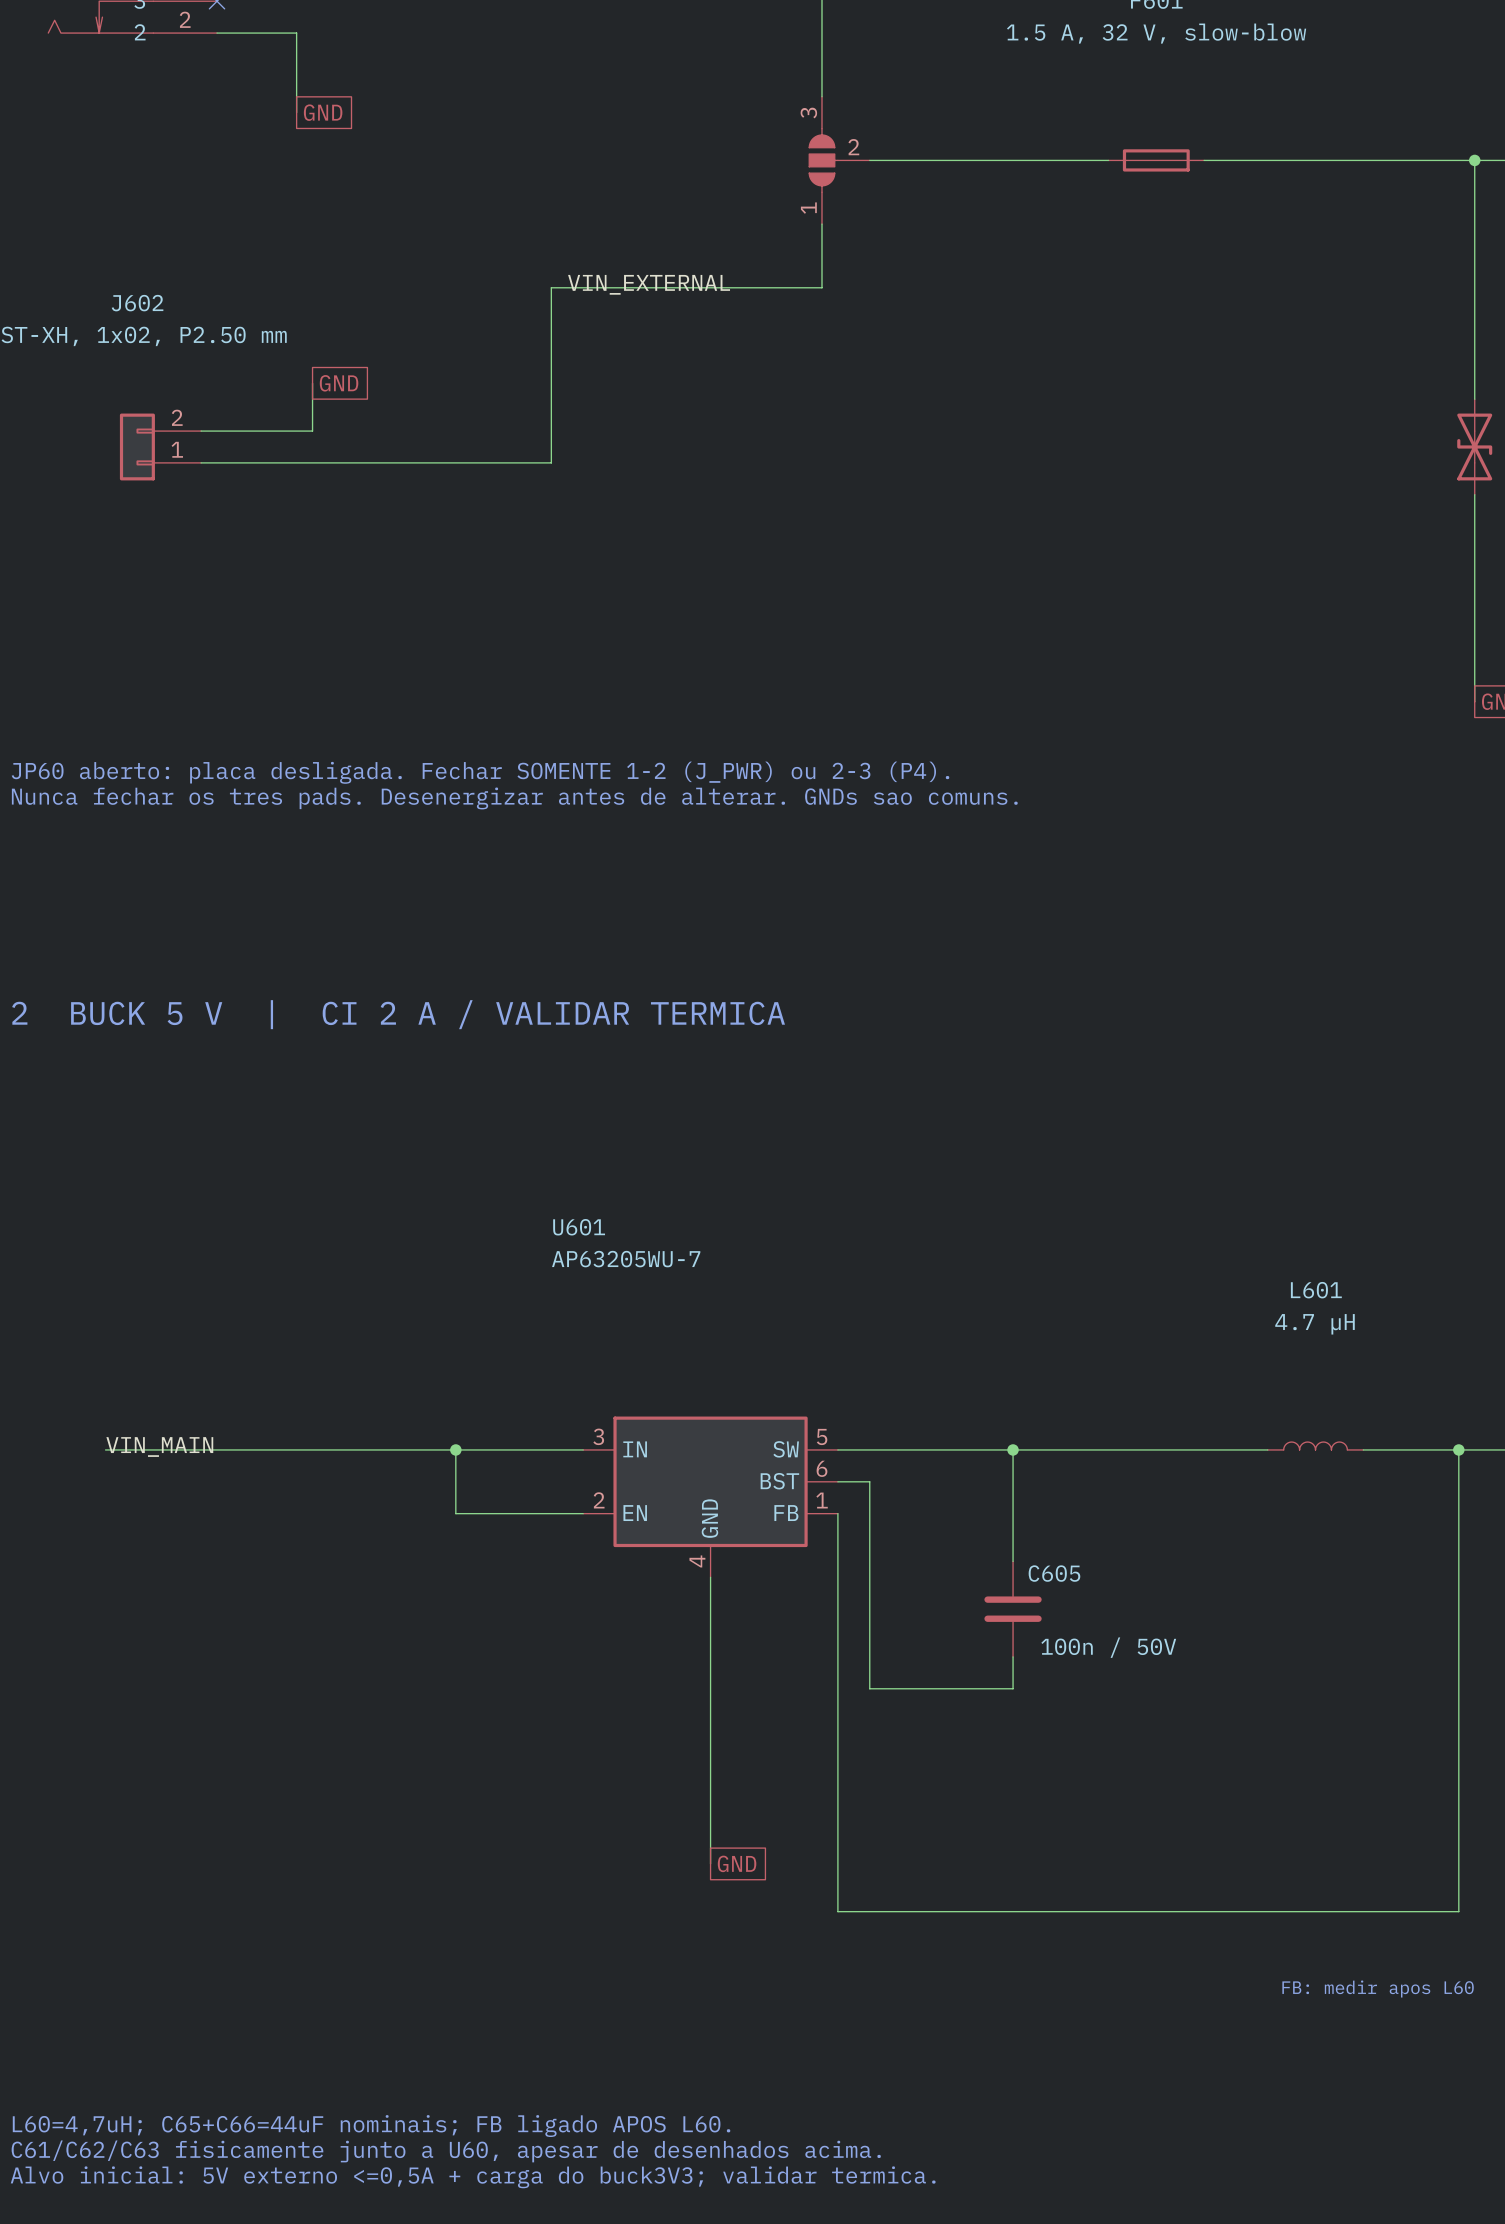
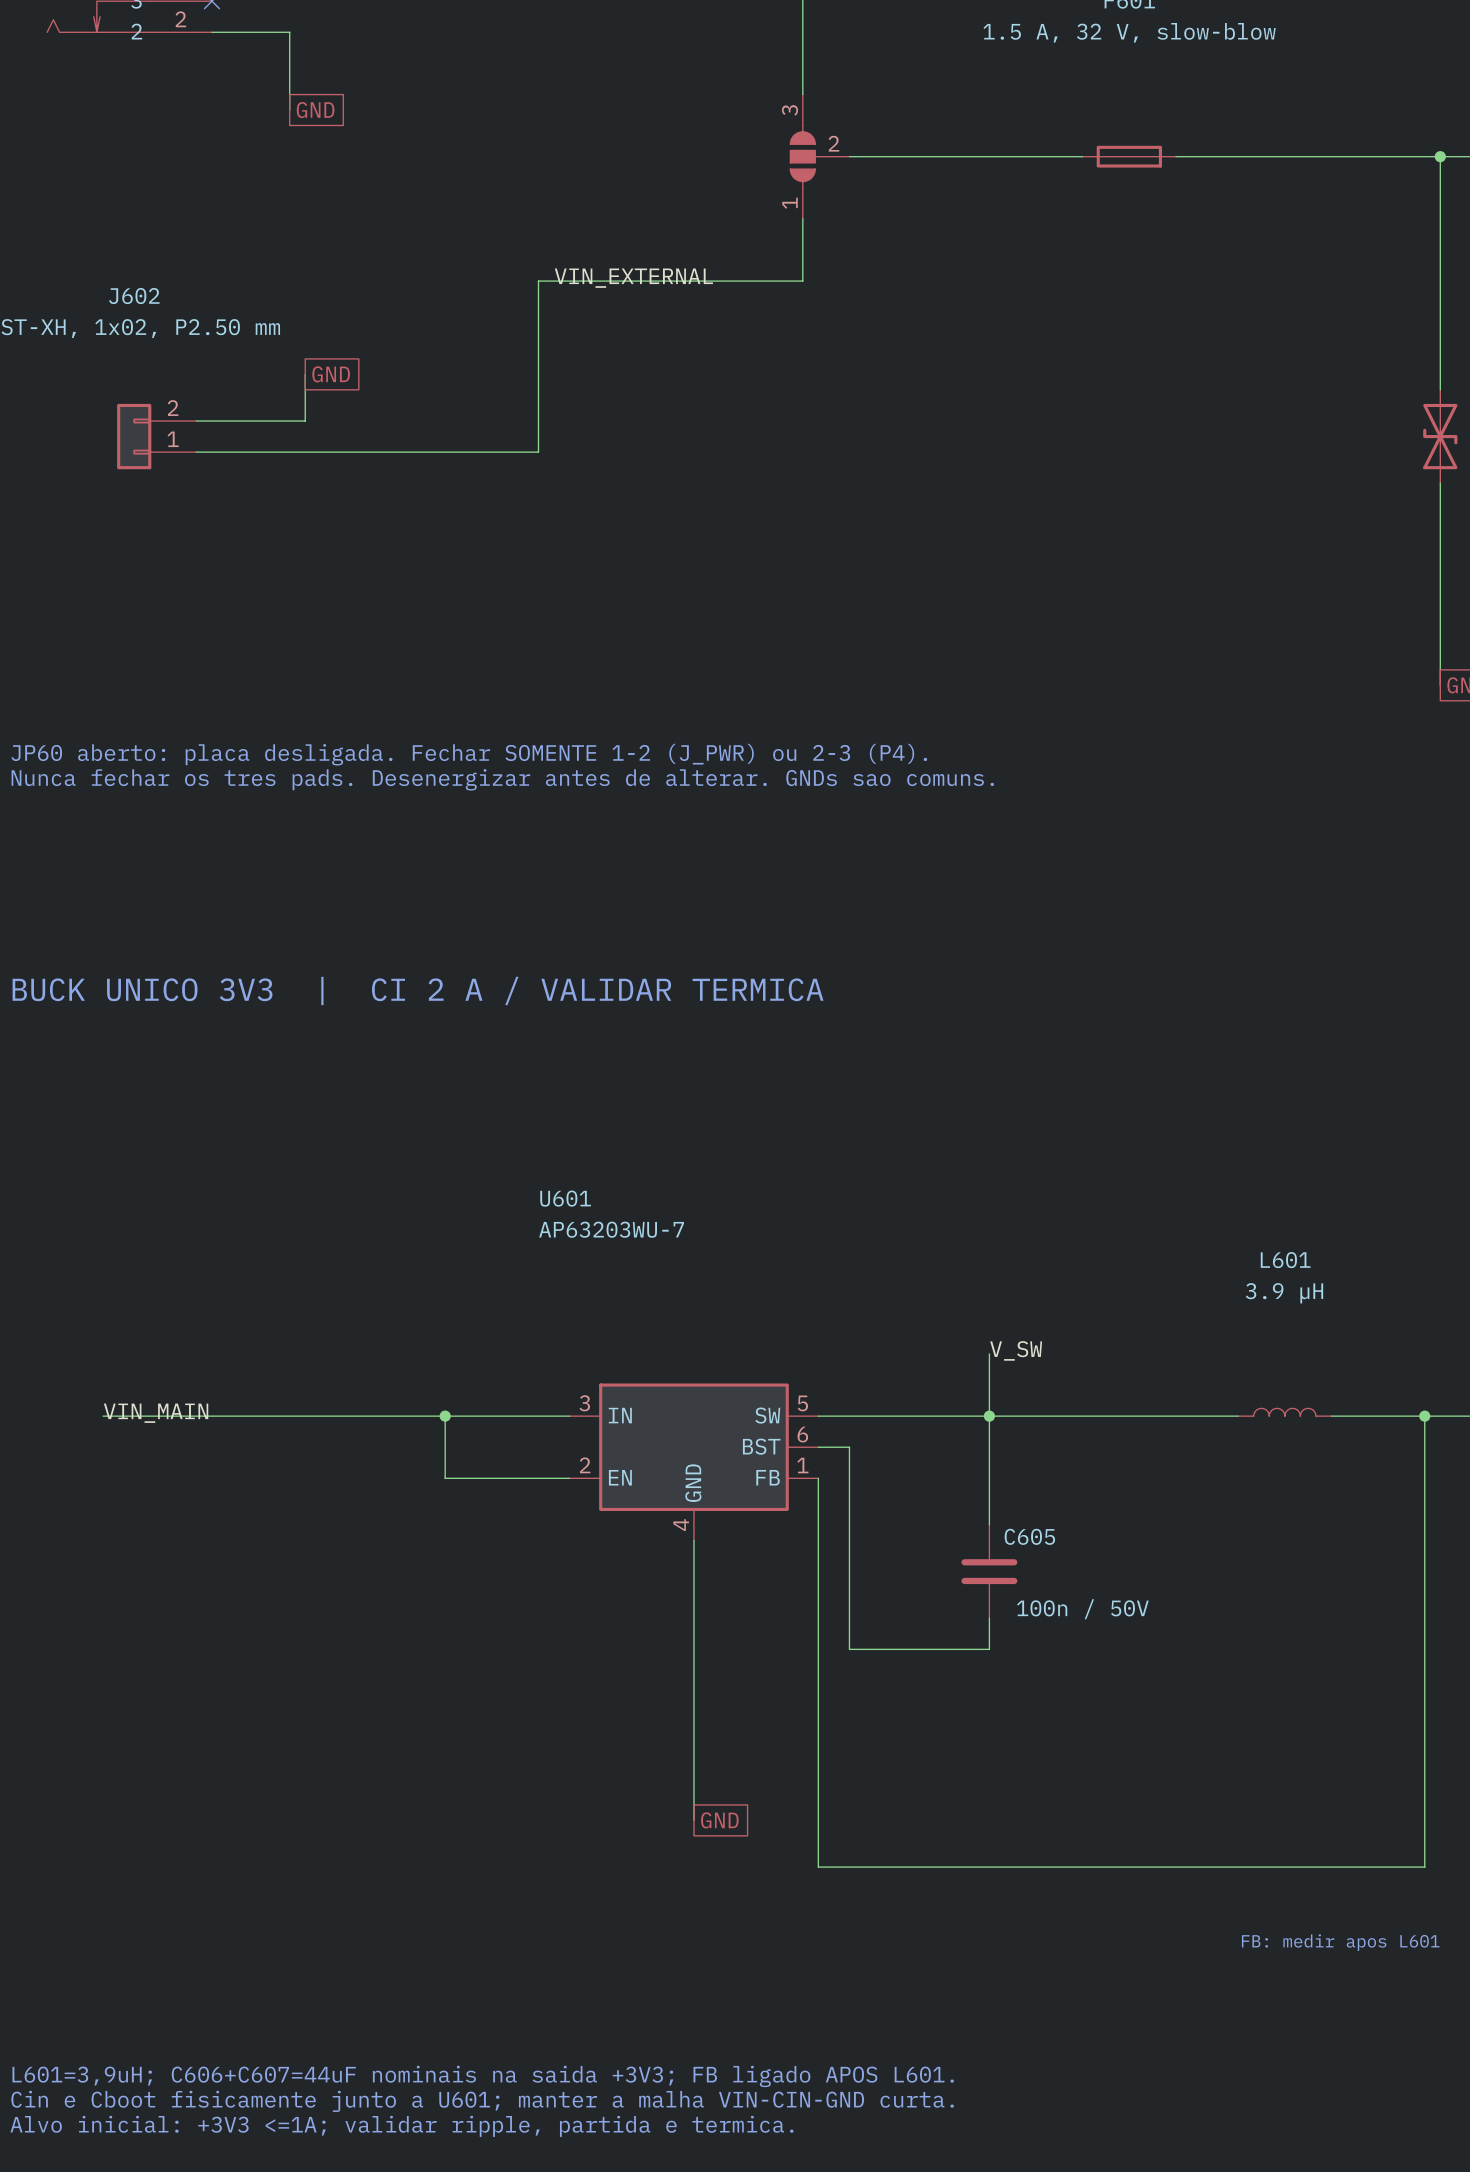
text: 2 BUCK 5 V | CI 2 A / VALIDAR TERMICA (398, 1014) -> BUCK UNICO 3V3 | CI 2 A / VALIDAR TERMICA (418, 990)
U601 value: AP63205WU-7 (626, 1259) -> AP63203WU-7 (611, 1229)
L601 value: 4.7 µH (1315, 1324) -> 3.9 µH (1284, 1293)
label: none -> V_SW (1016, 1350)
wire: none -> (989, 1353) (989, 1416)
text: FB: medir apos L60 (1378, 1989) -> FB: medir apos L601 (1340, 1942)
text: L60=4,7uH; C65+C66=44uF nominais; FB ligado APOS L60. (371, 2126) -> L601=3,9uH; C606+C607=44uF nominais na saida +3V3; FB ligado APOS L601. (483, 2076)
text: C61/C62/C63 fisicamente junto a U60, apesar de desenhados acima. (446, 2151) -> Cin e Cboot fisicamente junto a U601; manter a malha VIN-CIN-GND curta. (482, 2101)
text: Alvo inicial: 5V externo <=0,5A + carga do buck3V3; validar termica. (473, 2177) -> Alvo inicial: +3V3 <=1A; validar ripple, partida e termica. (401, 2126)

